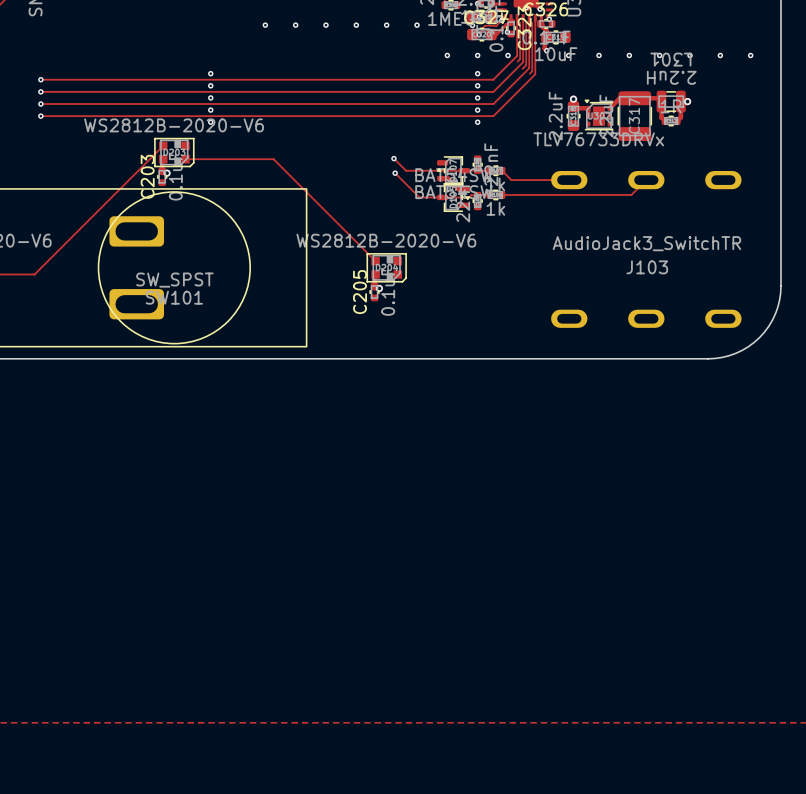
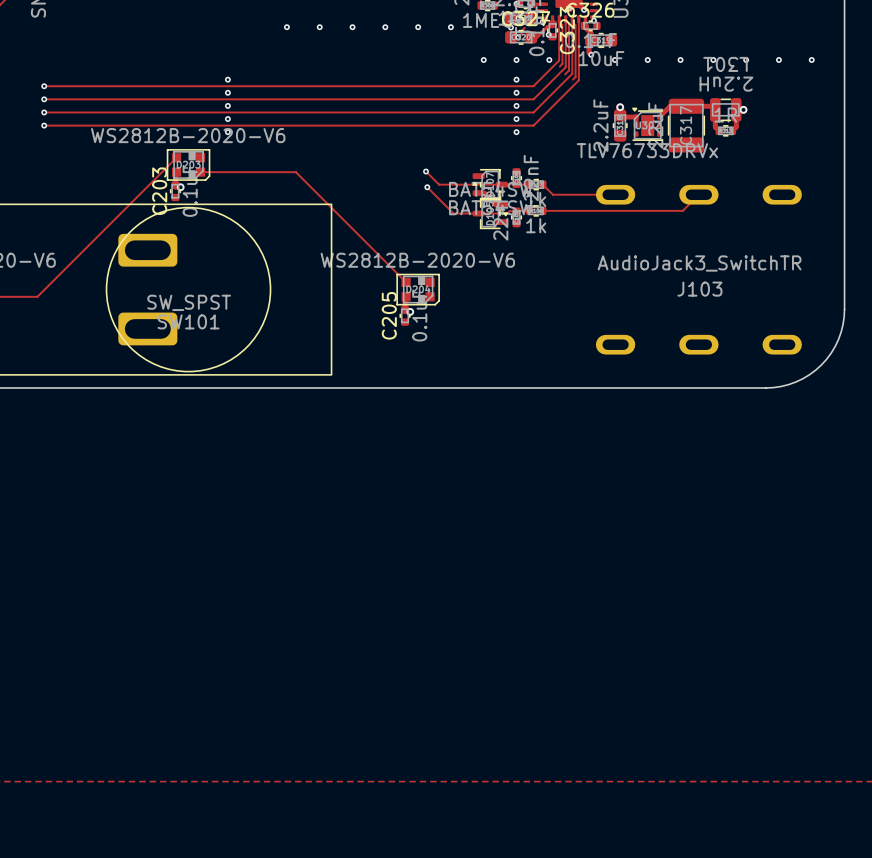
track: (501, 20) (496, 25) (485, 25) -> none

